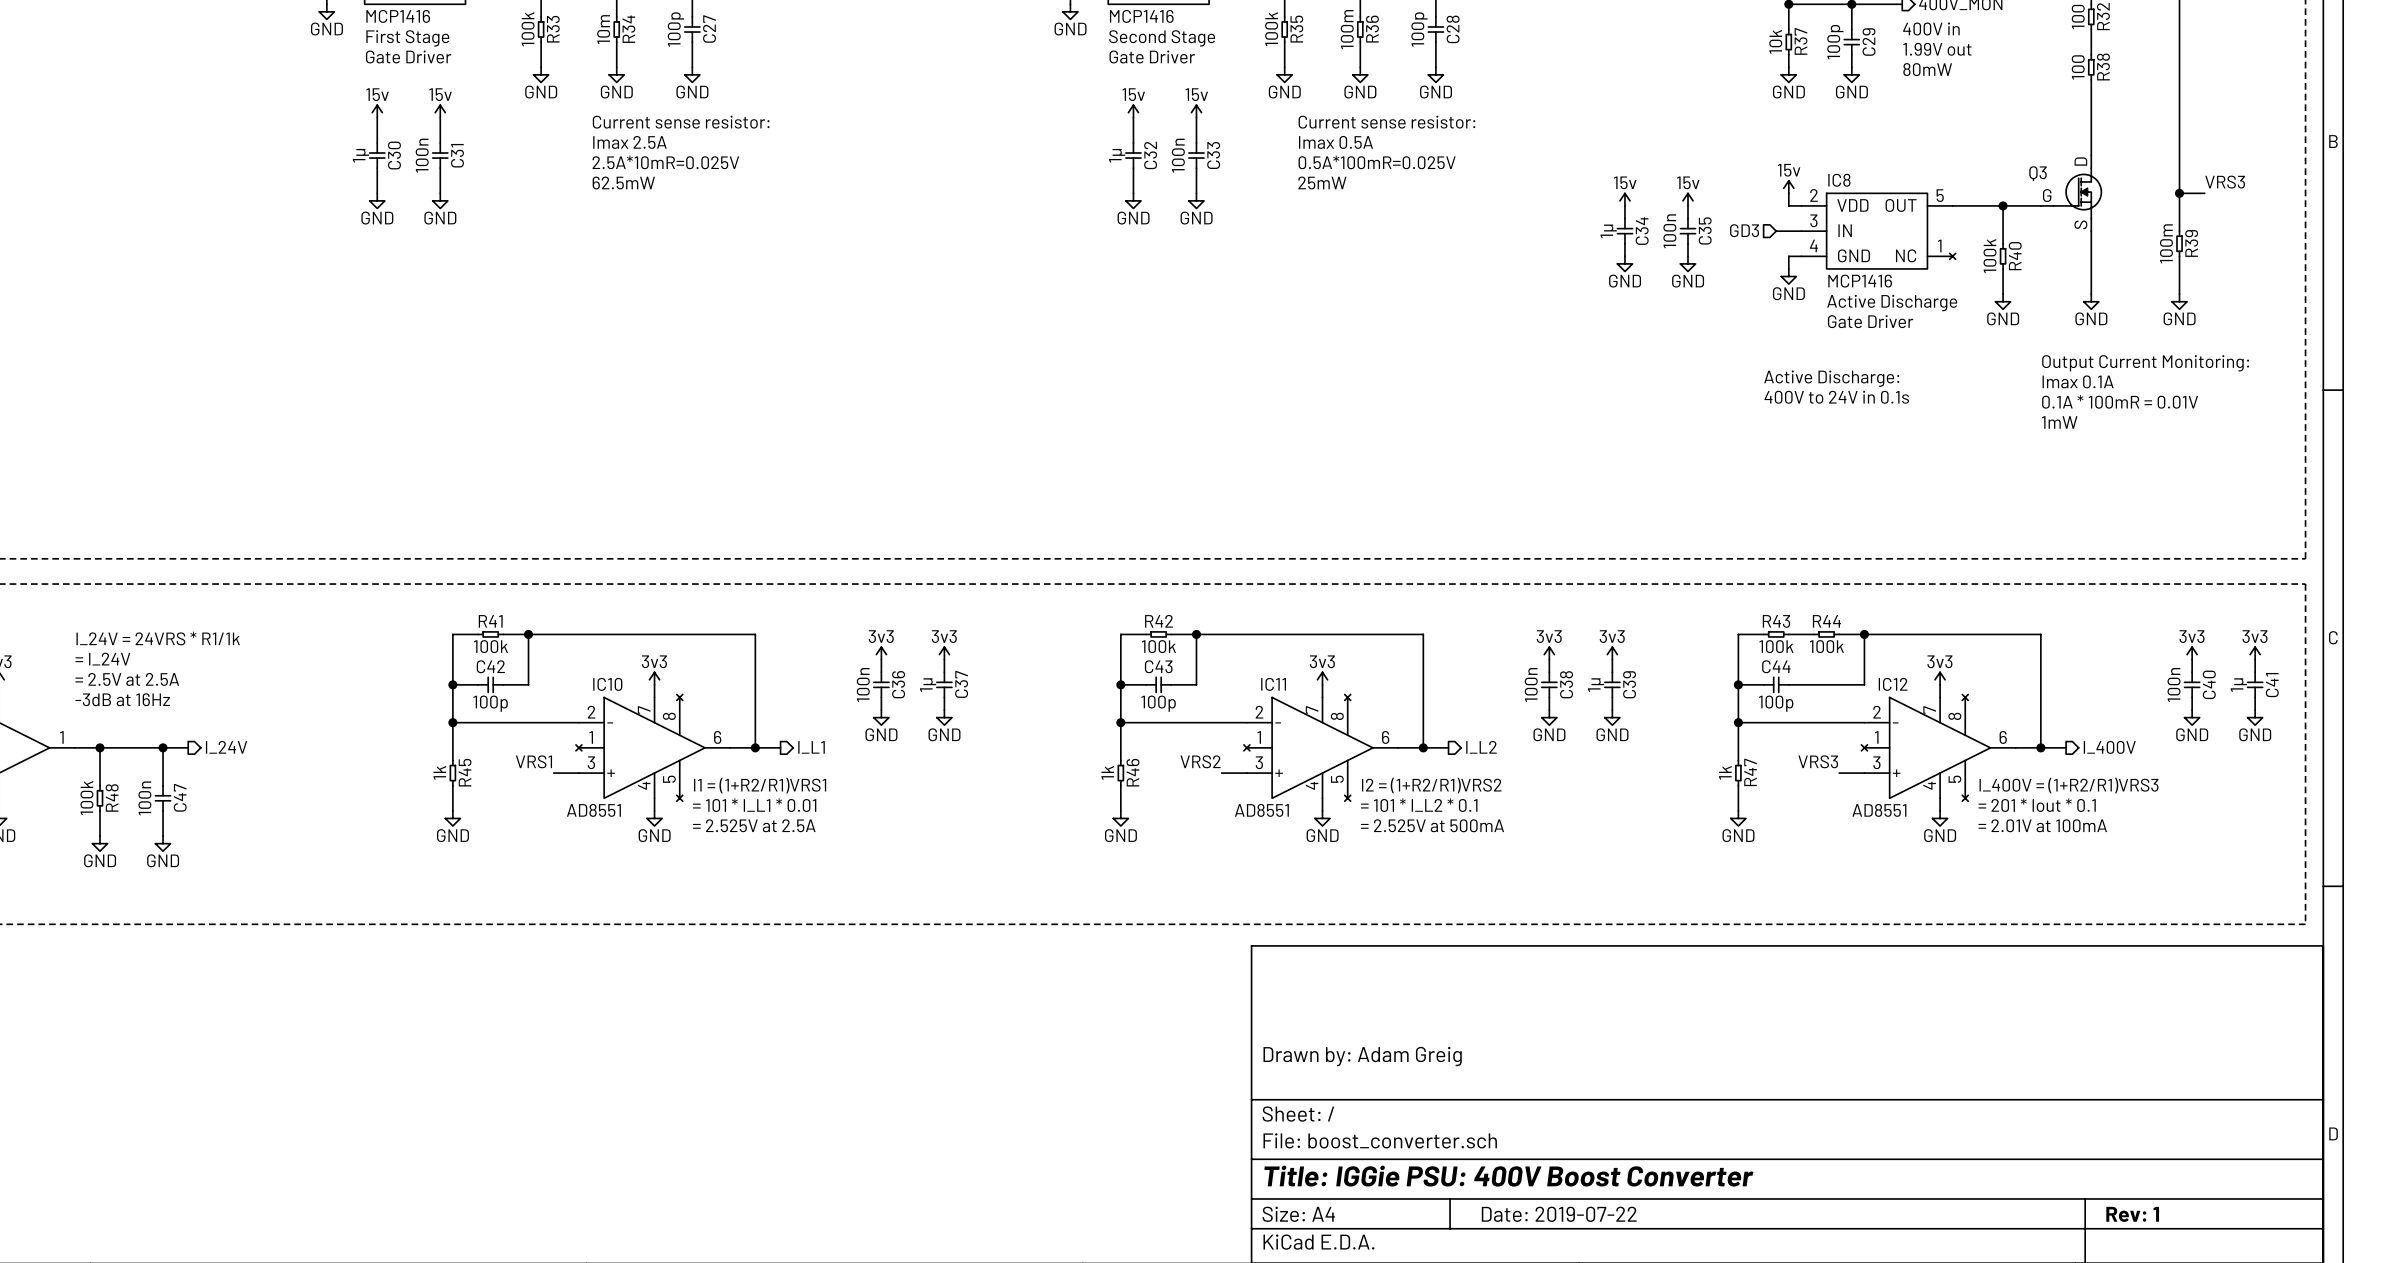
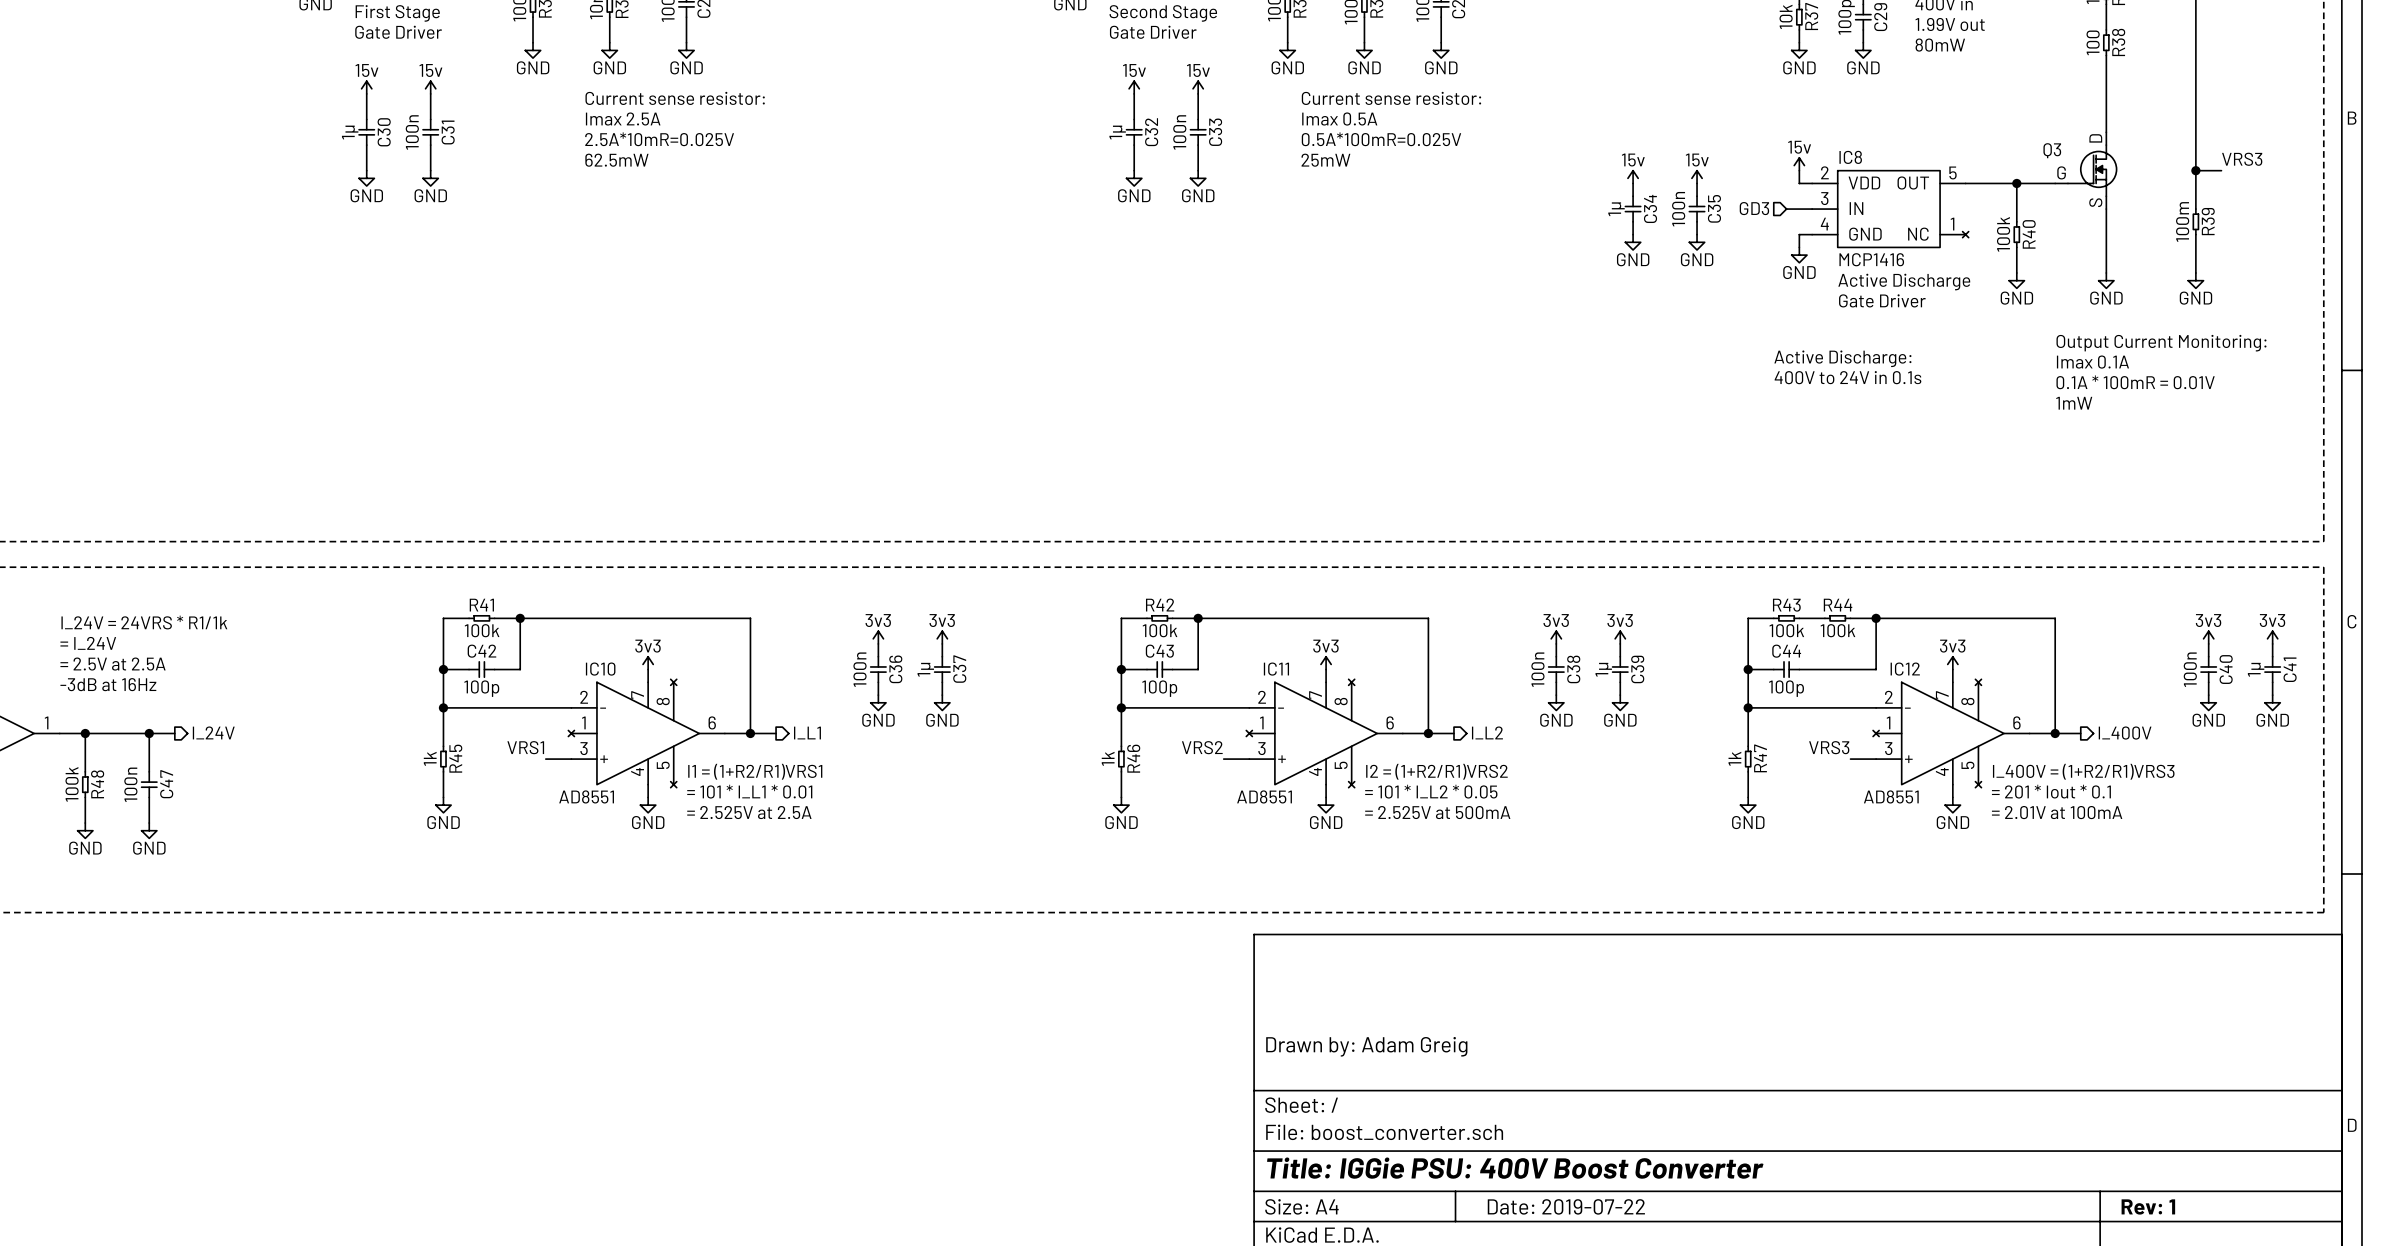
text: = 101 * I_L2 * 0.1 (1419, 805) -> = 101 * I_L2 * 0.05 (1431, 791)

